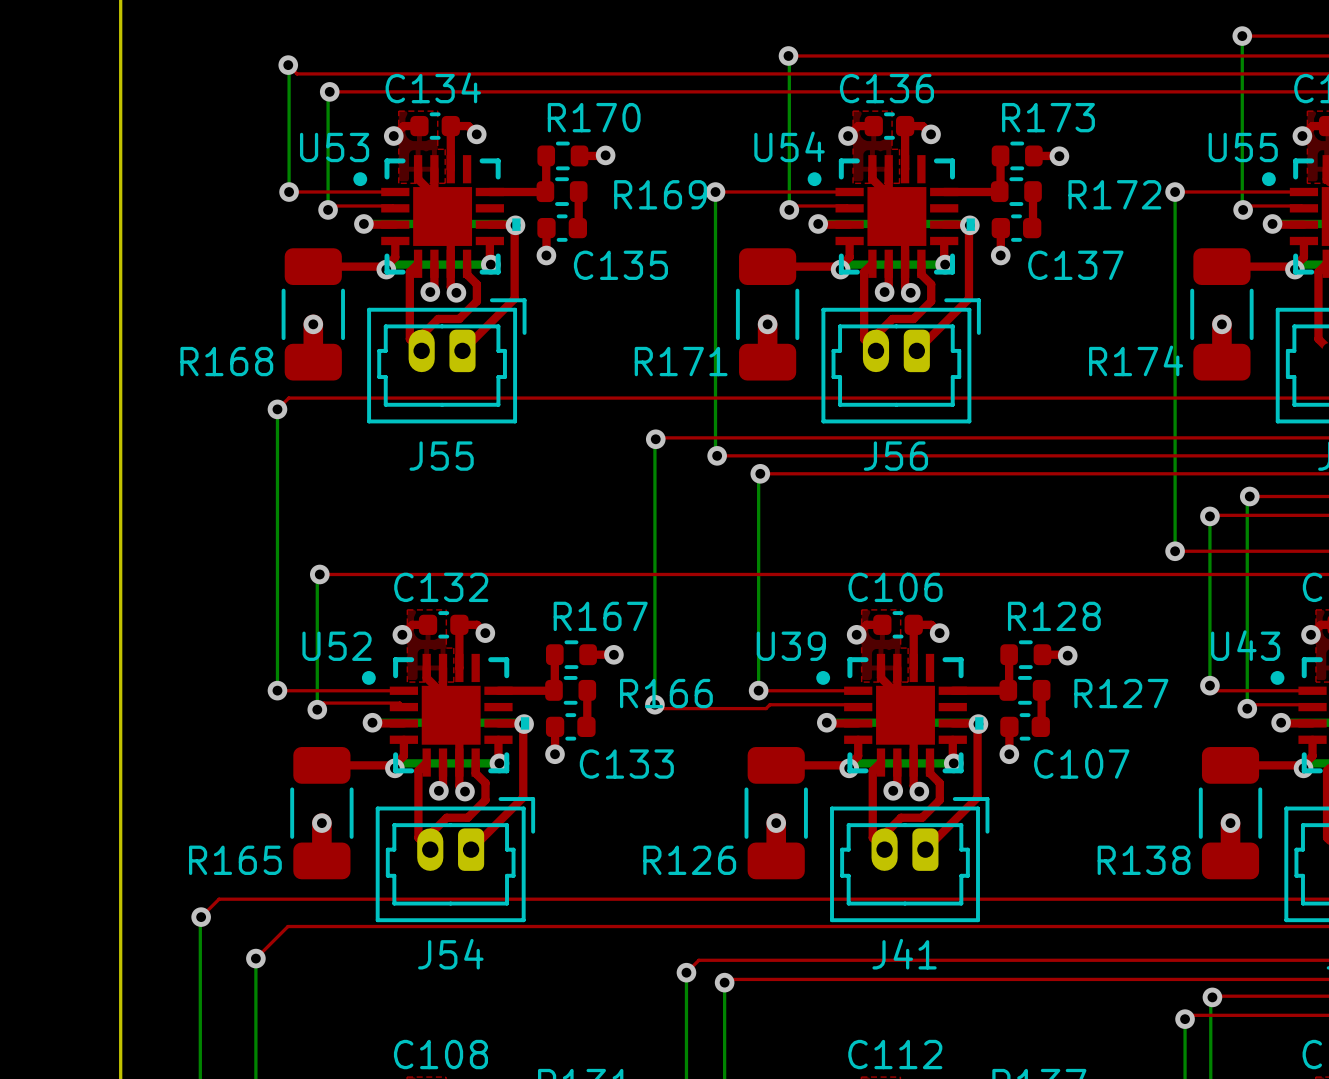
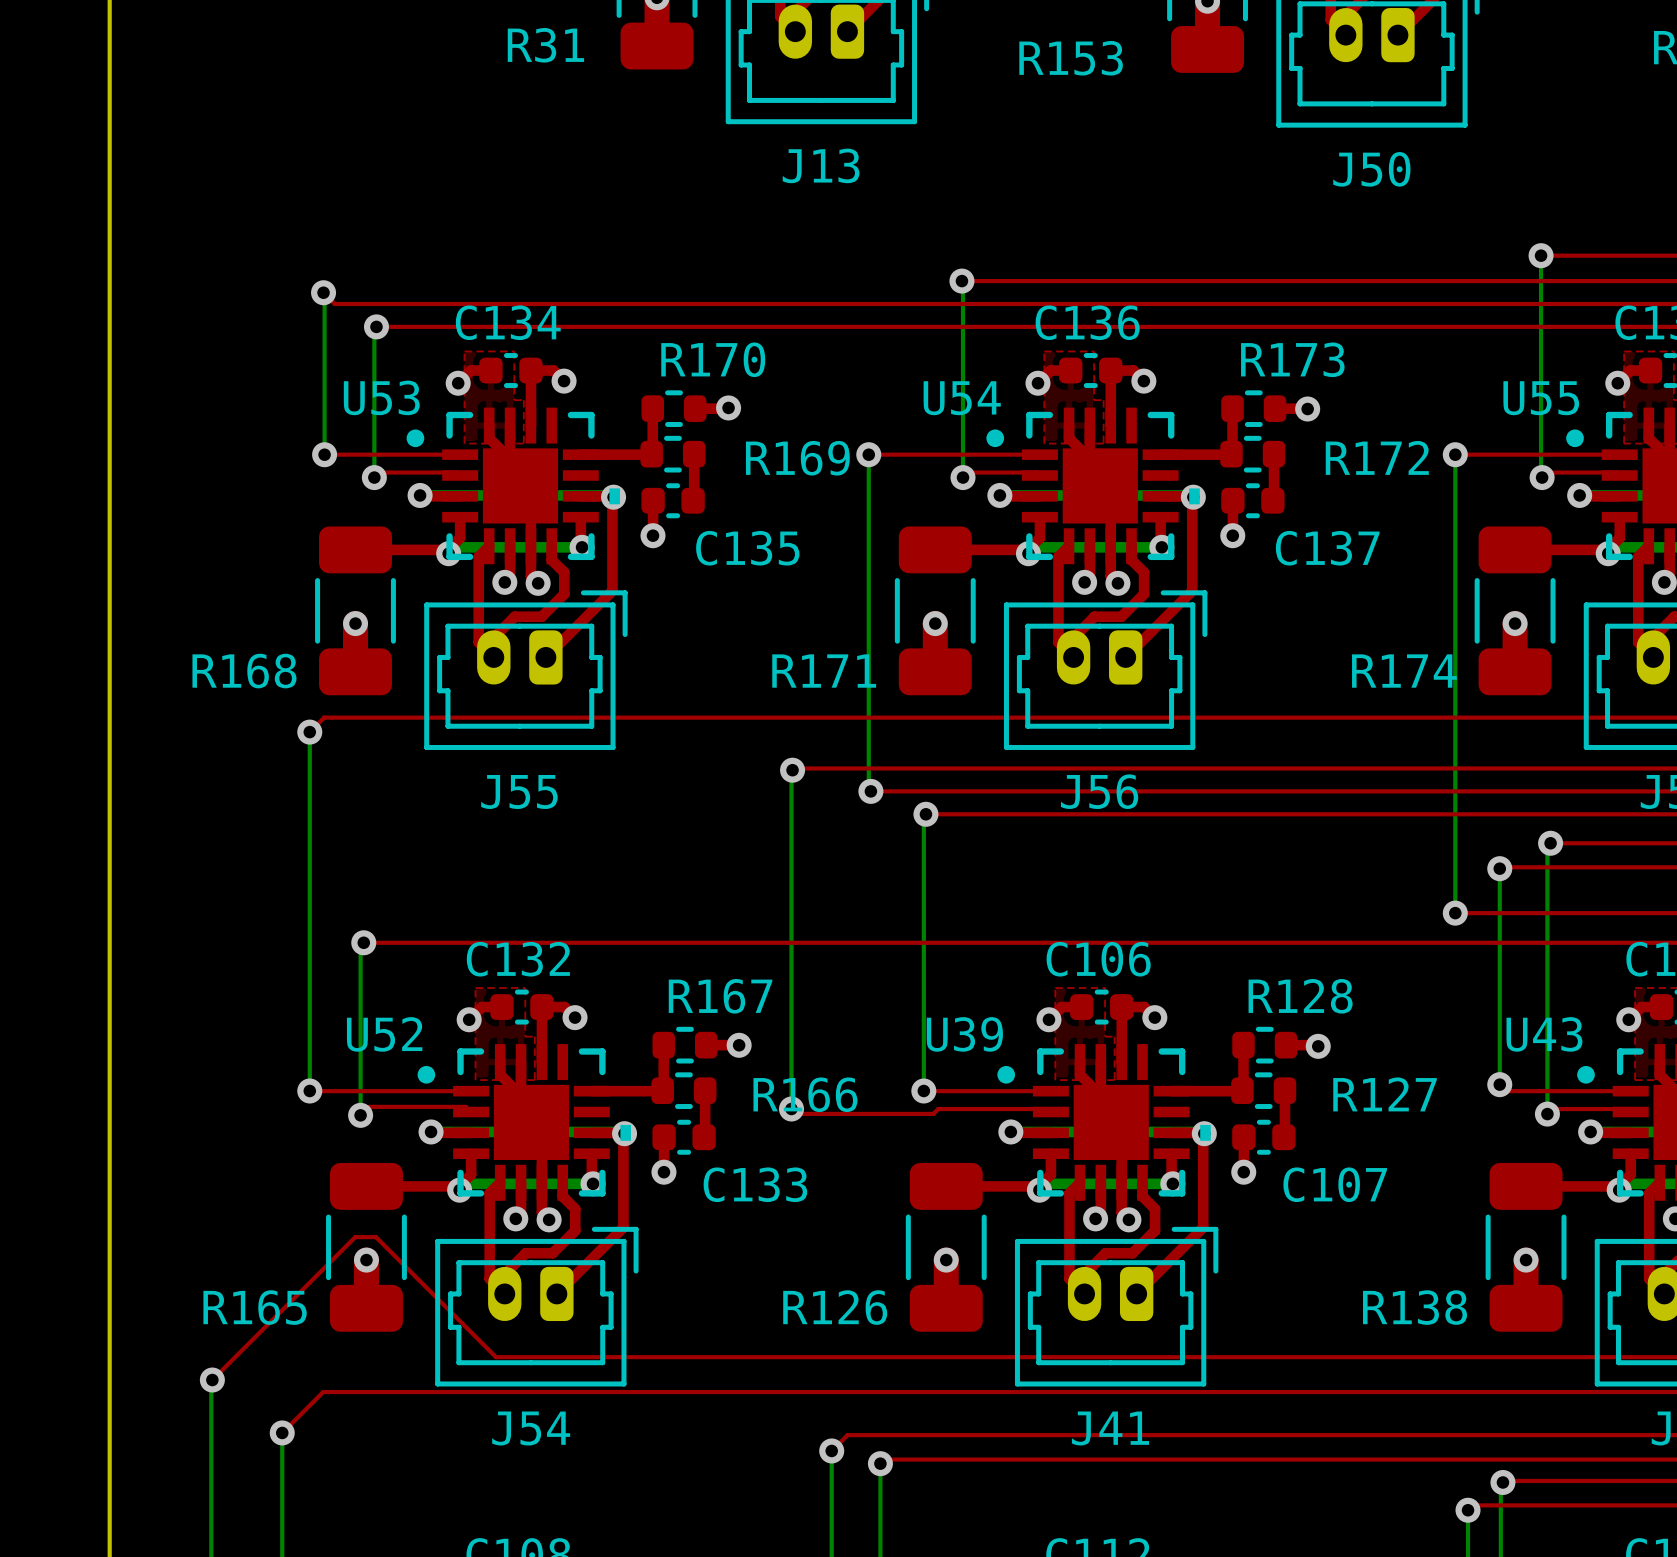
top track: (219, 899) (423, 899) -> (235, 1357) (355, 1237) (375, 1237) (495, 1357)

